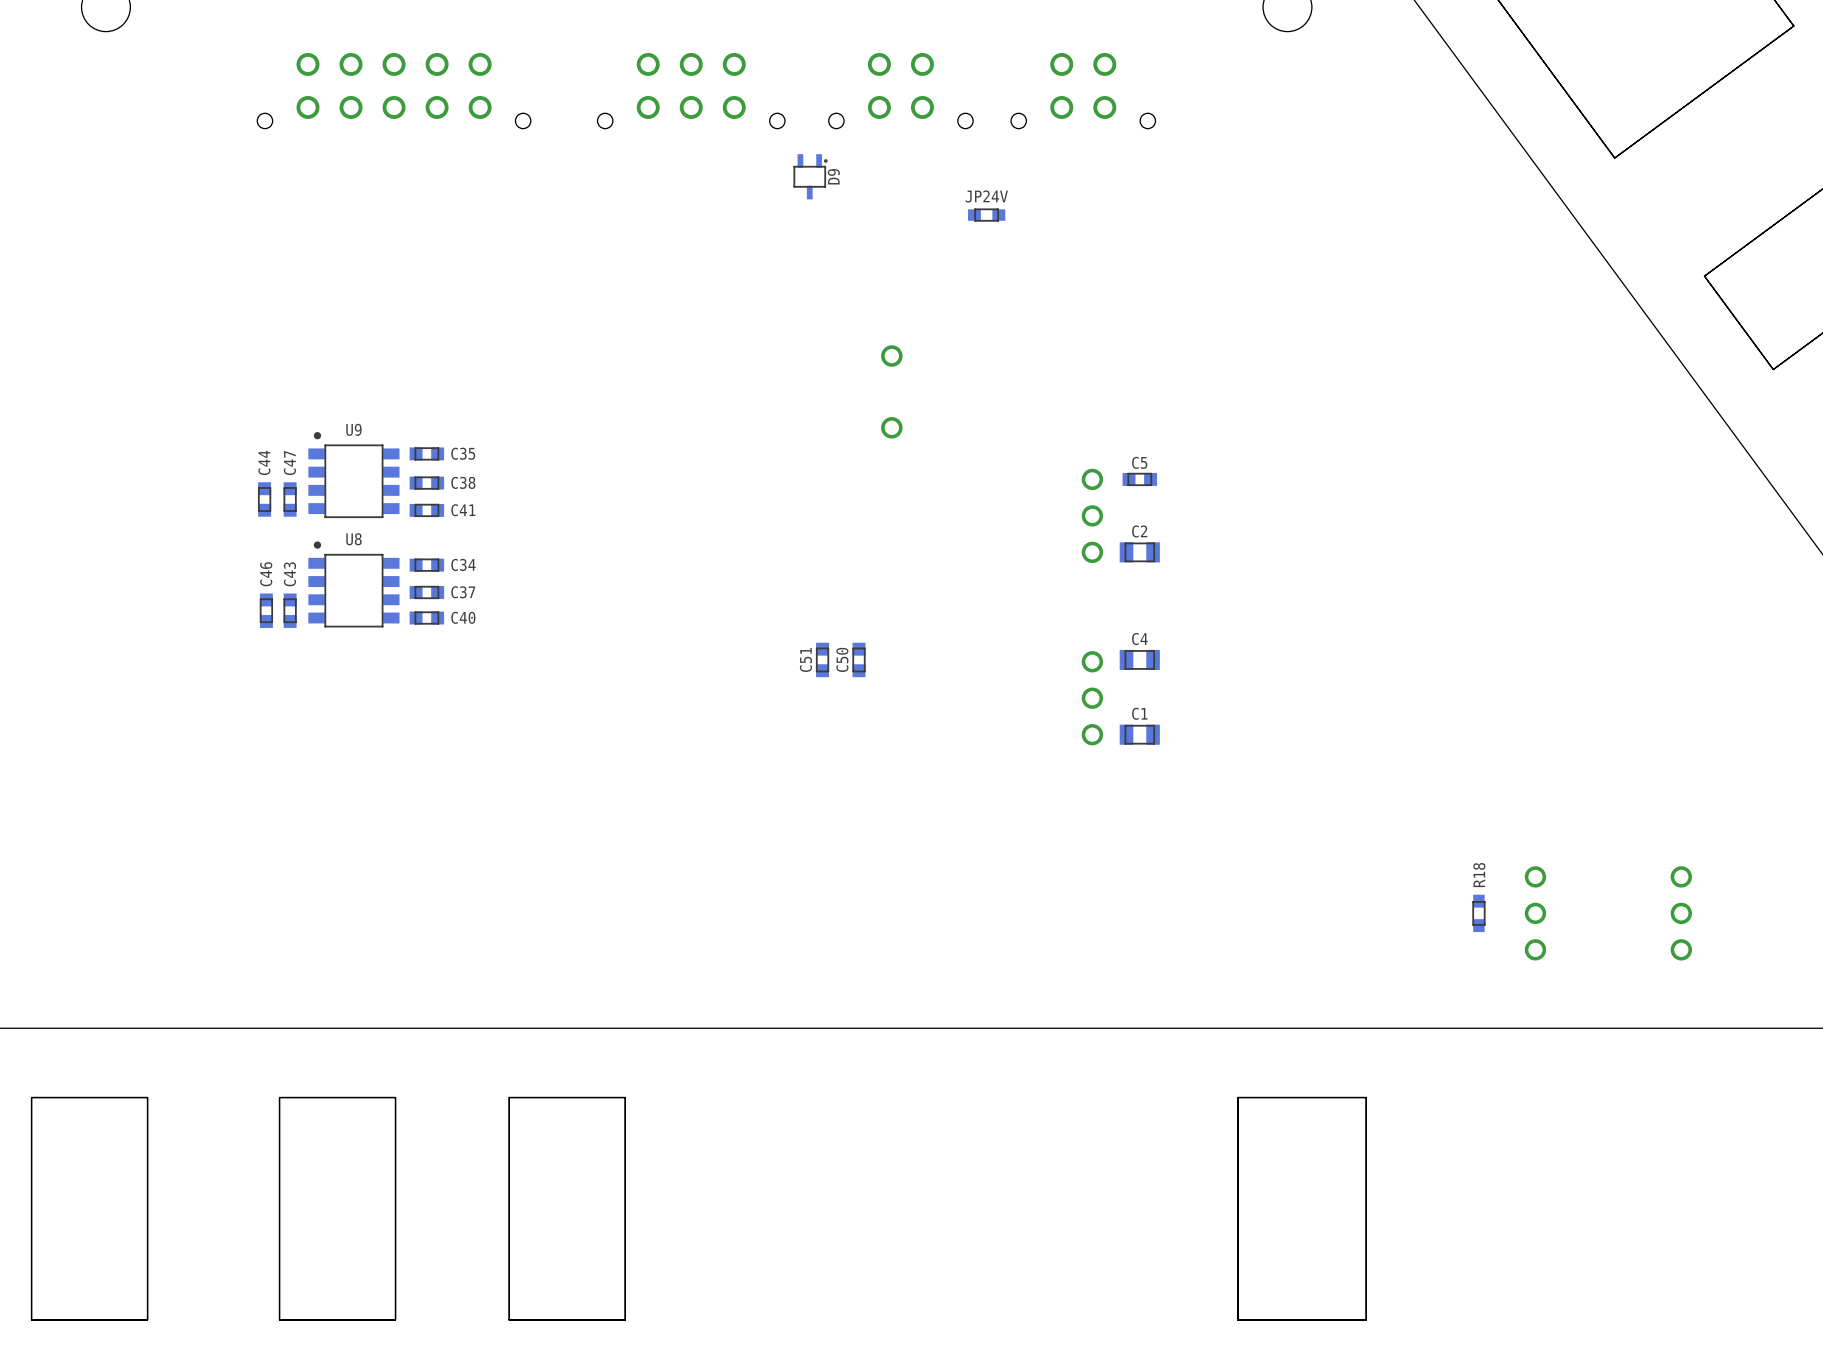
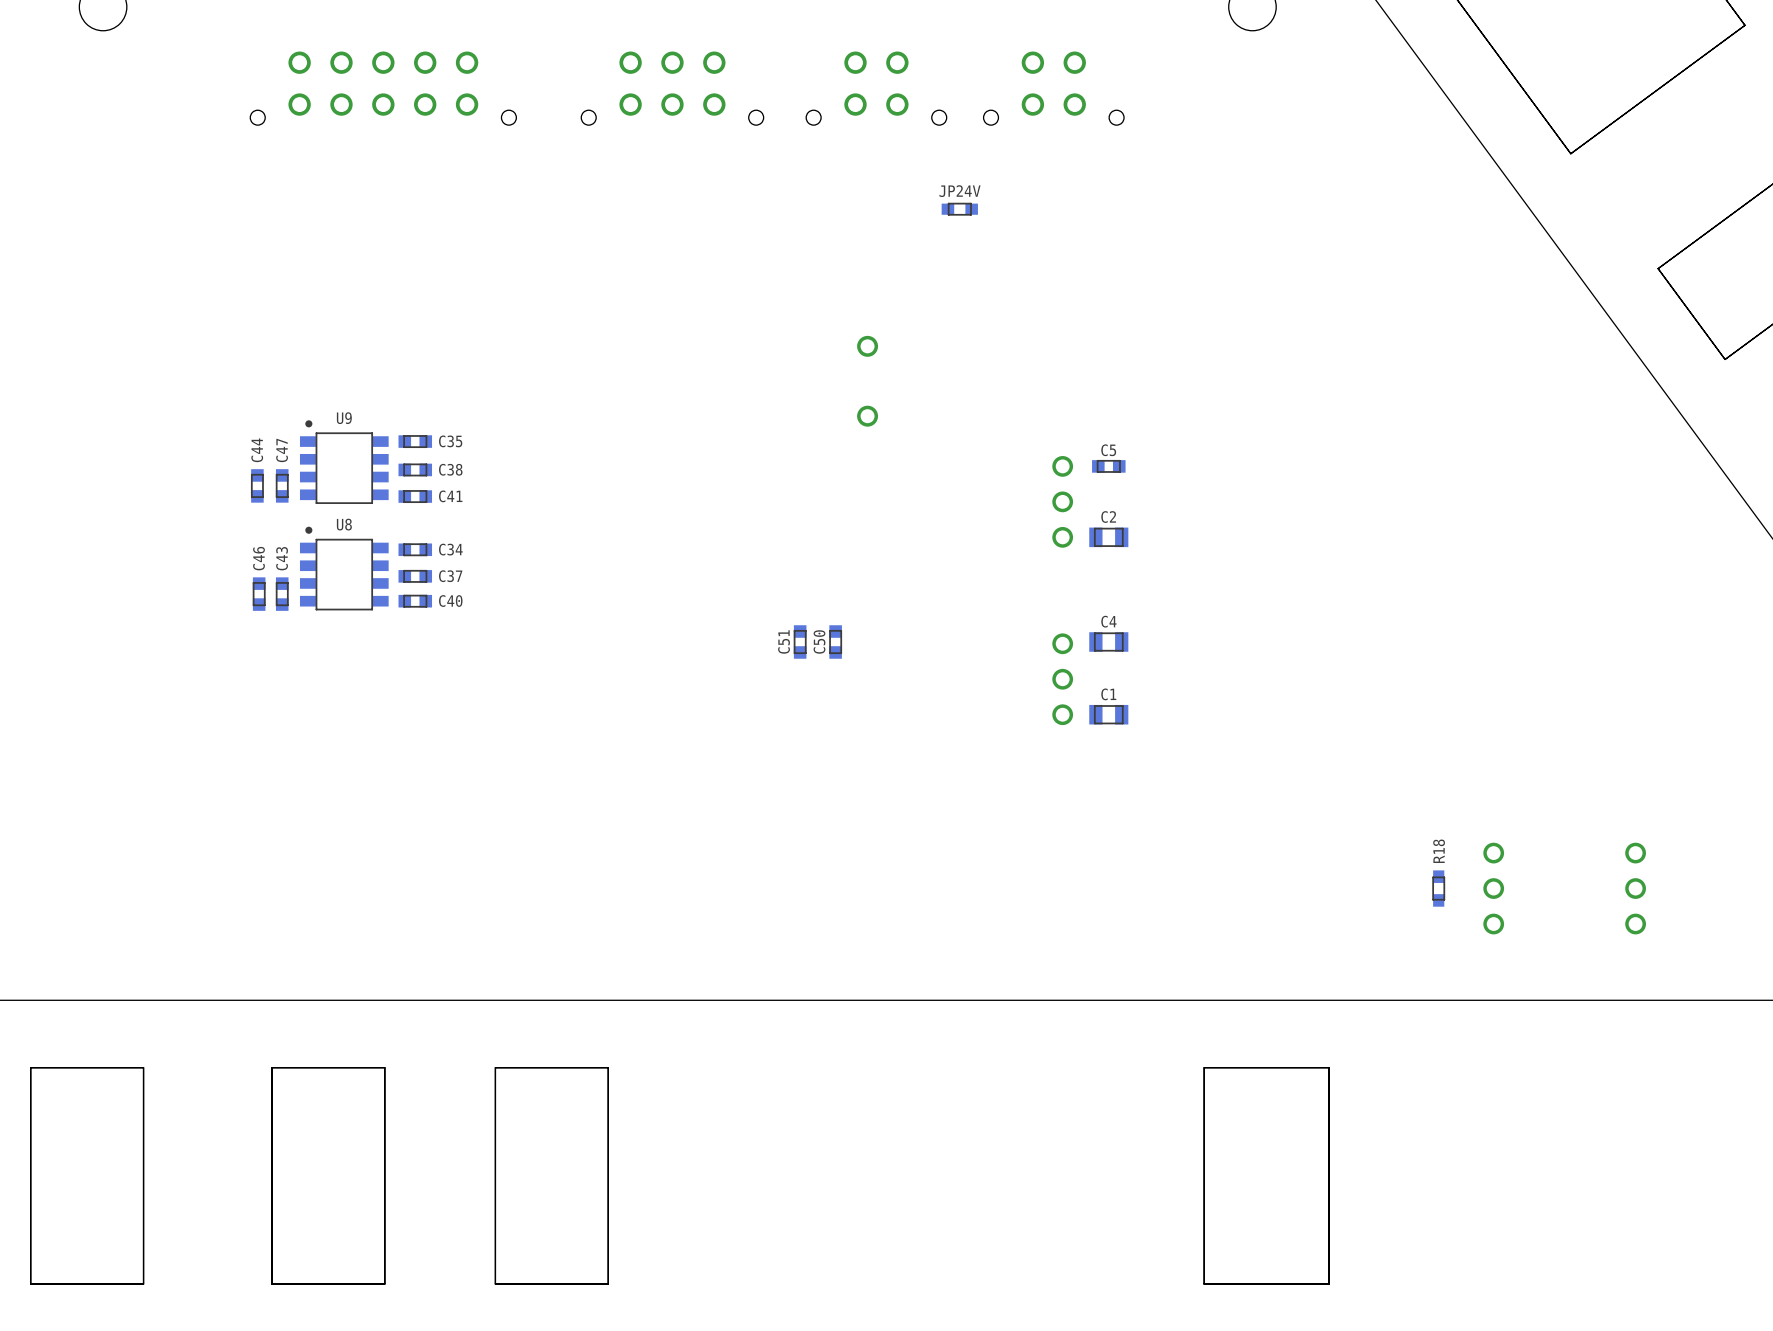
D9: (810, 176) -> none

